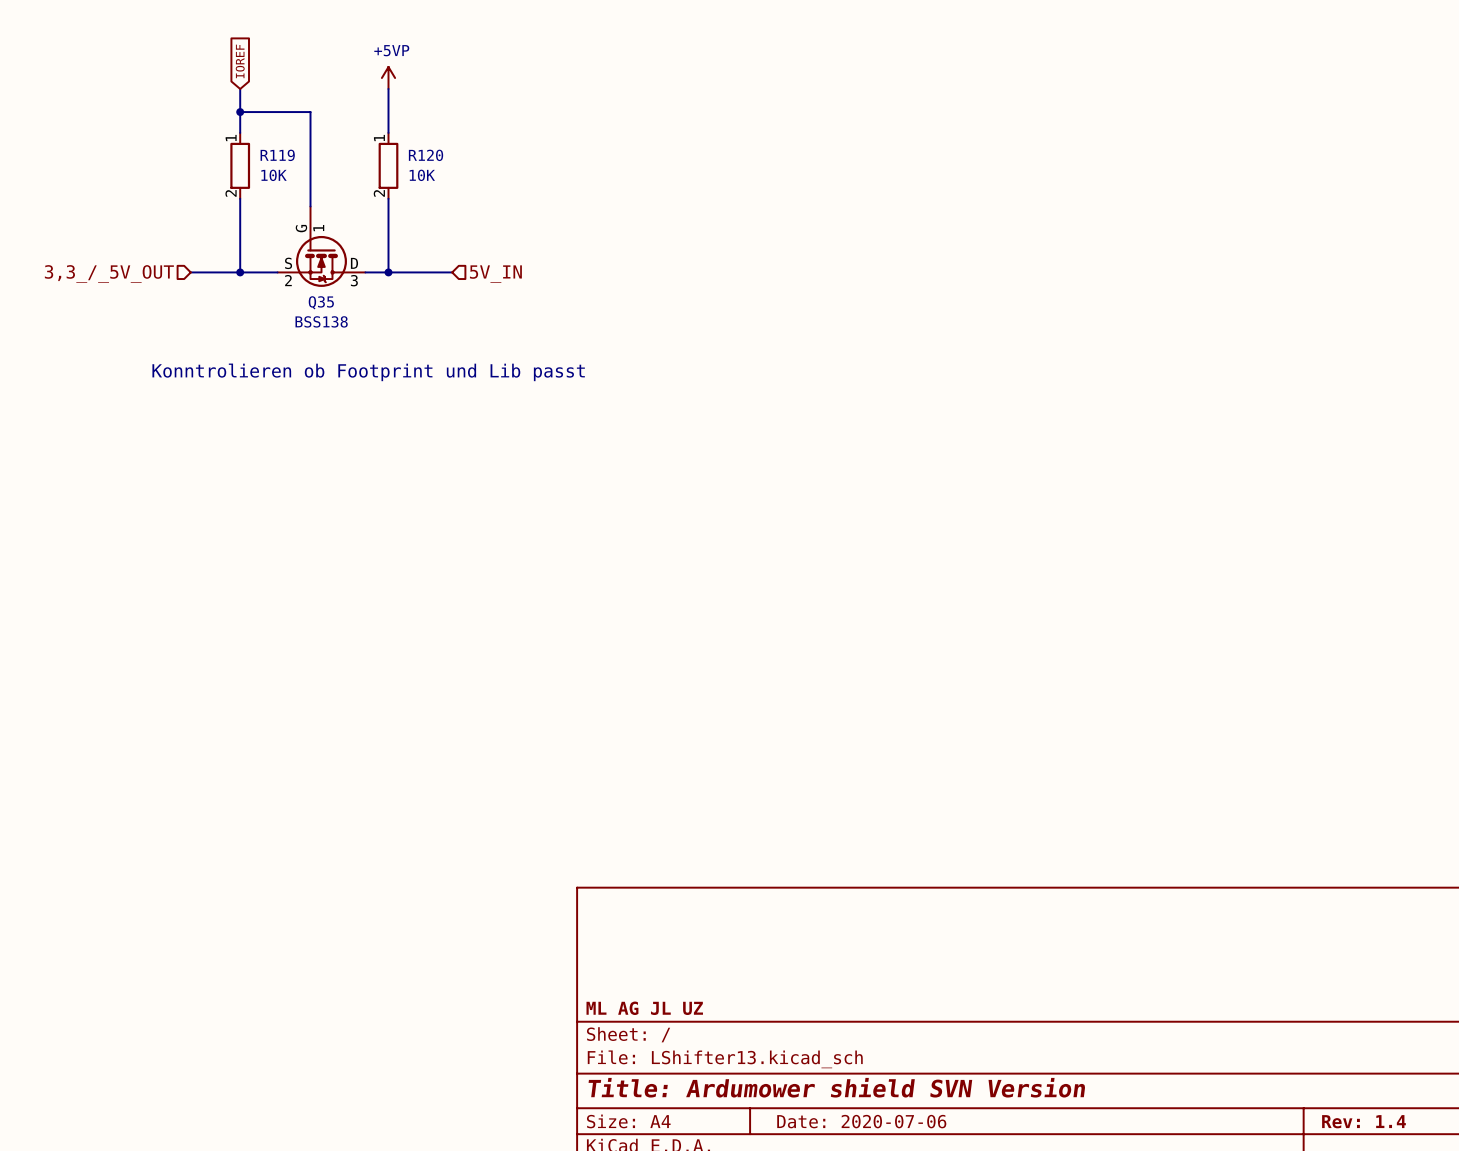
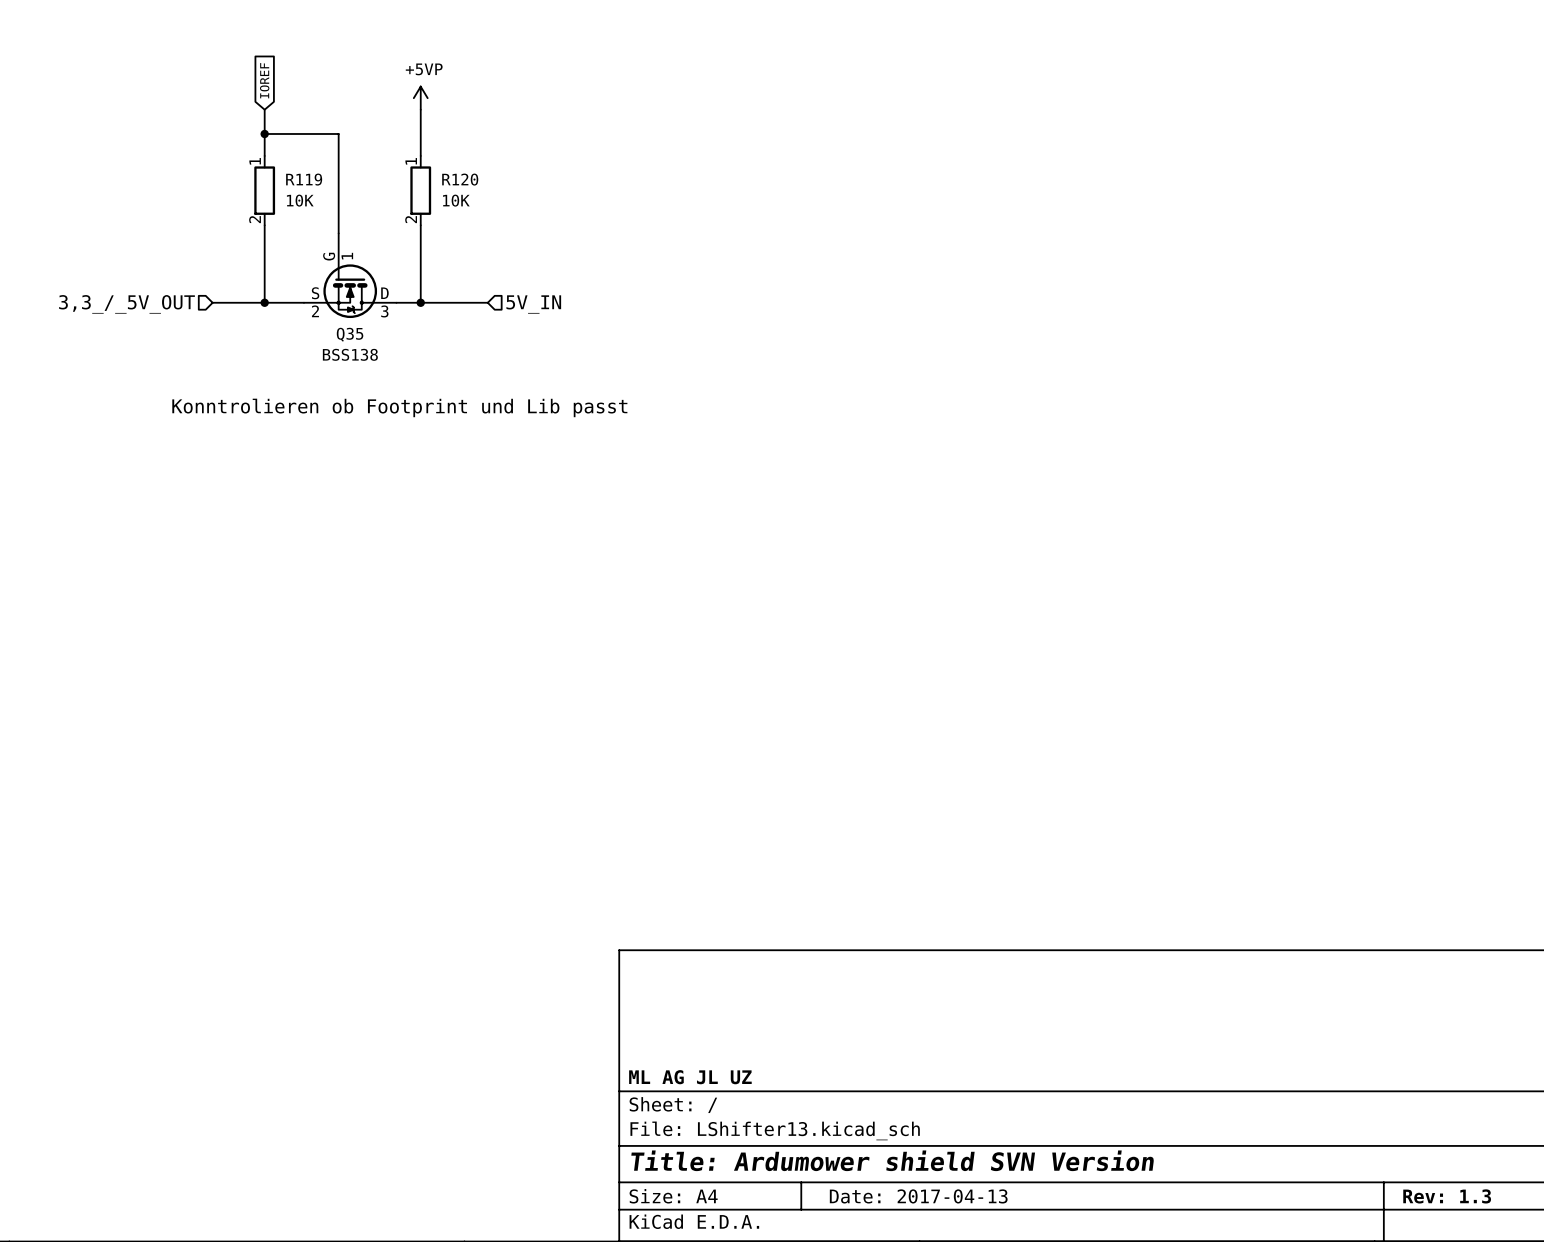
title block: Date: 2020-07-06 (861, 1121) -> Date: 2017-04-13 (918, 1196)
title block: Rev: 1.4 (1363, 1121) -> Rev: 1.3 (1447, 1196)

